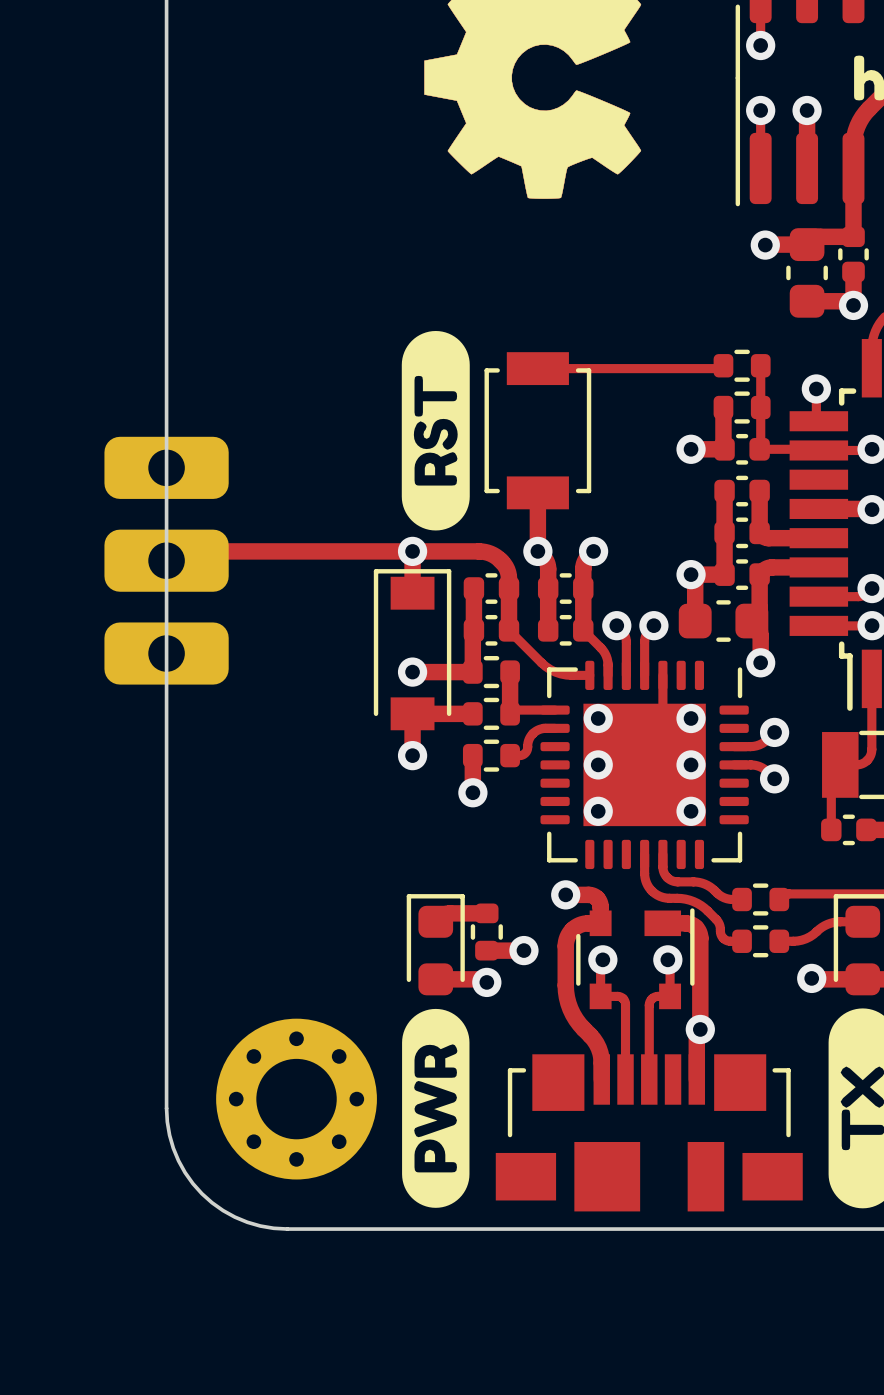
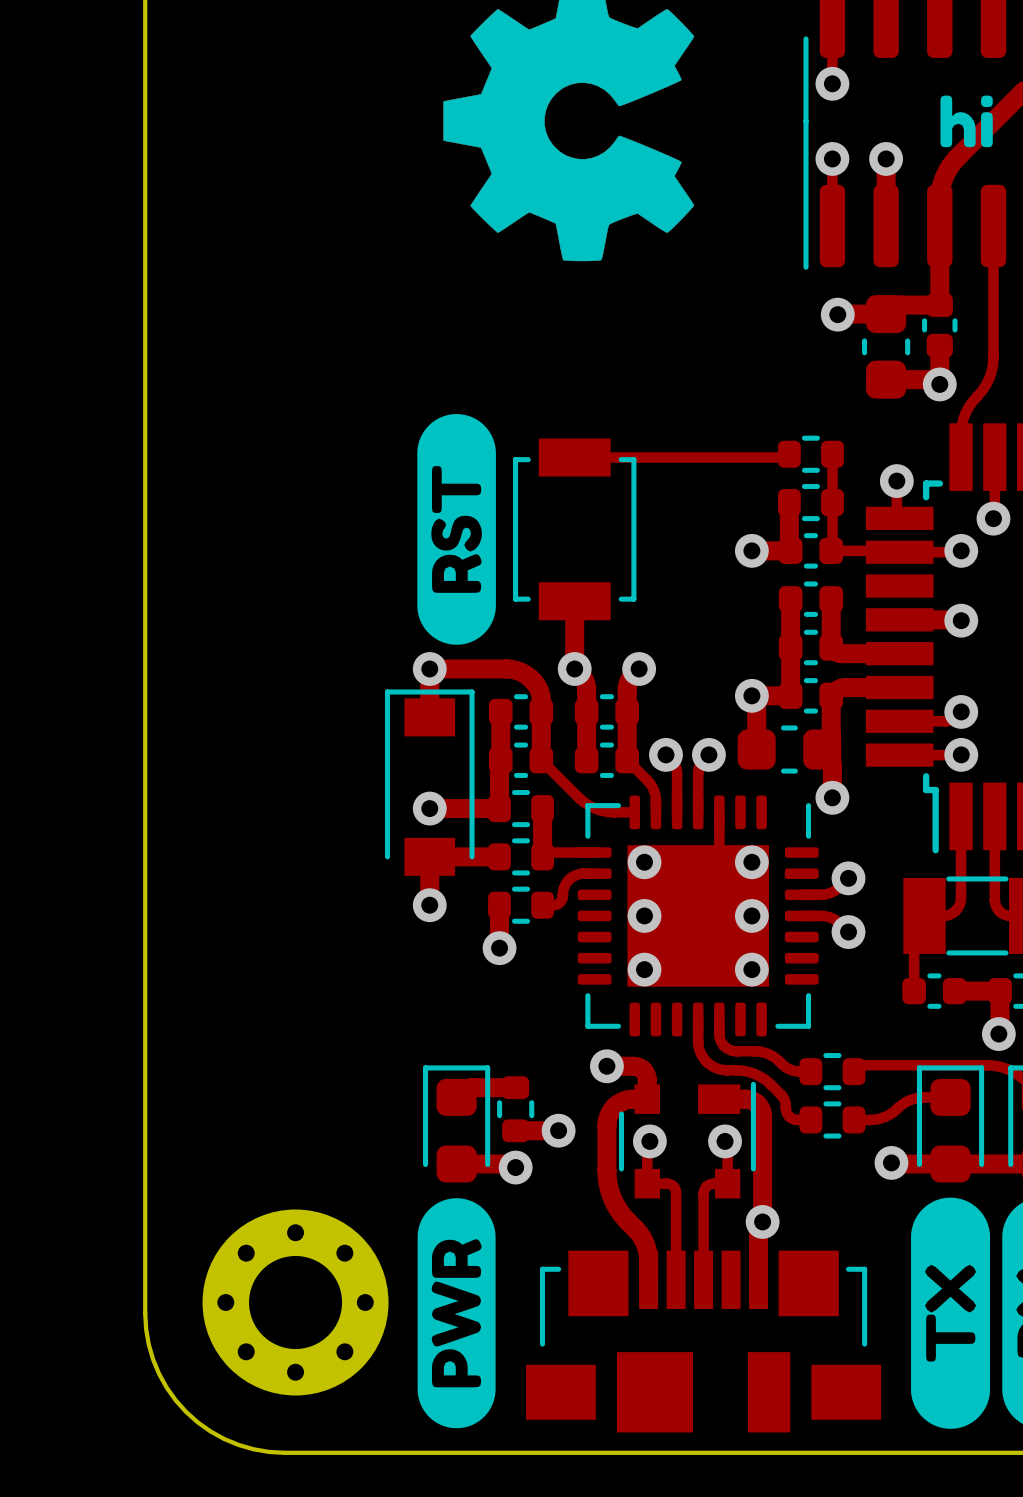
track: (412, 551) (182, 551) (174, 553) (166, 560) -> none
part: (166, 560) -> none

